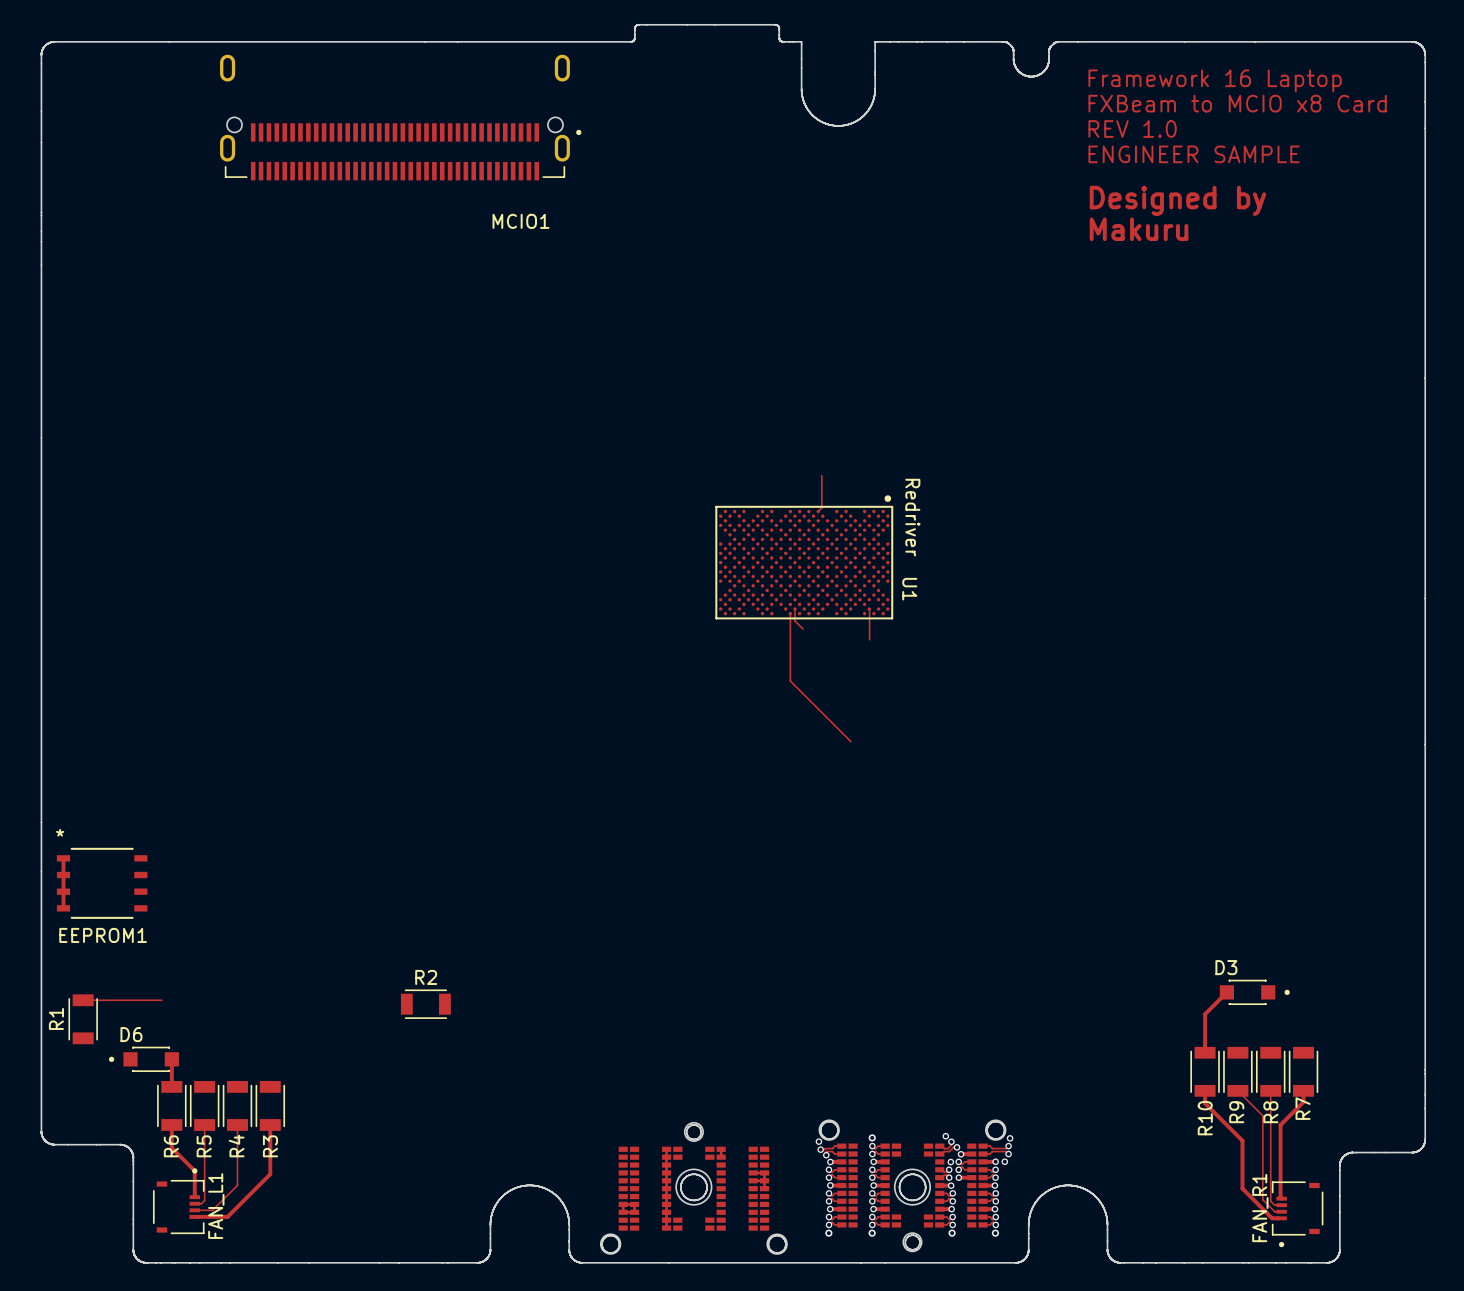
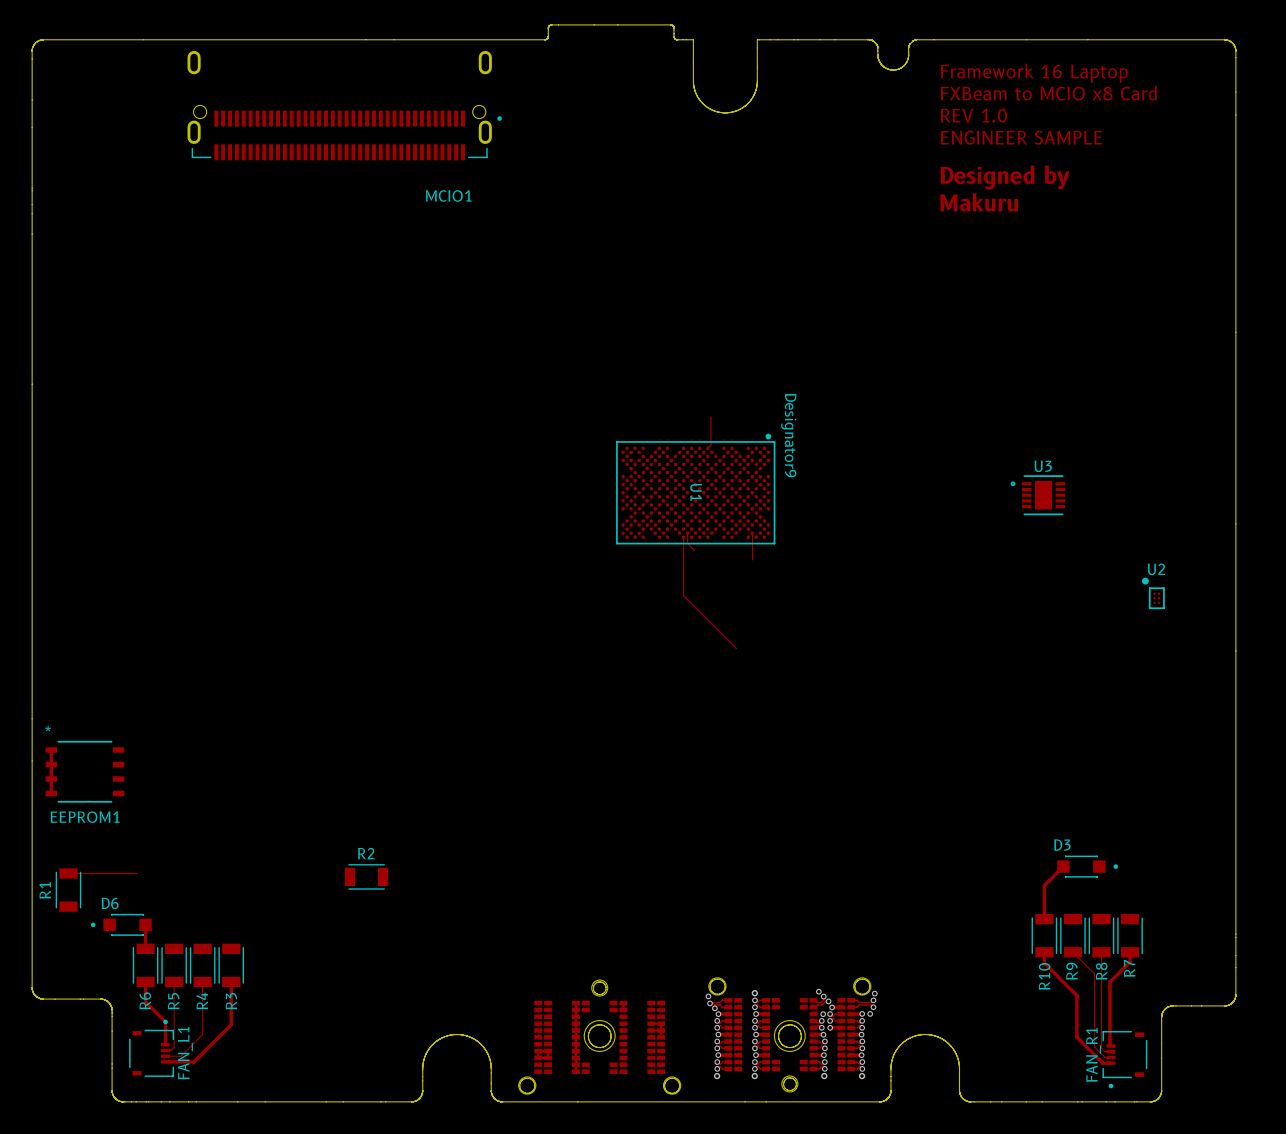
U1 footprint: [715, 495, 894, 620] -> [616, 433, 776, 545]
U3: none -> (1037, 495)
U1 name position: U1 (909, 589) -> U1 (696, 492)
U2: none -> (1153, 593)

